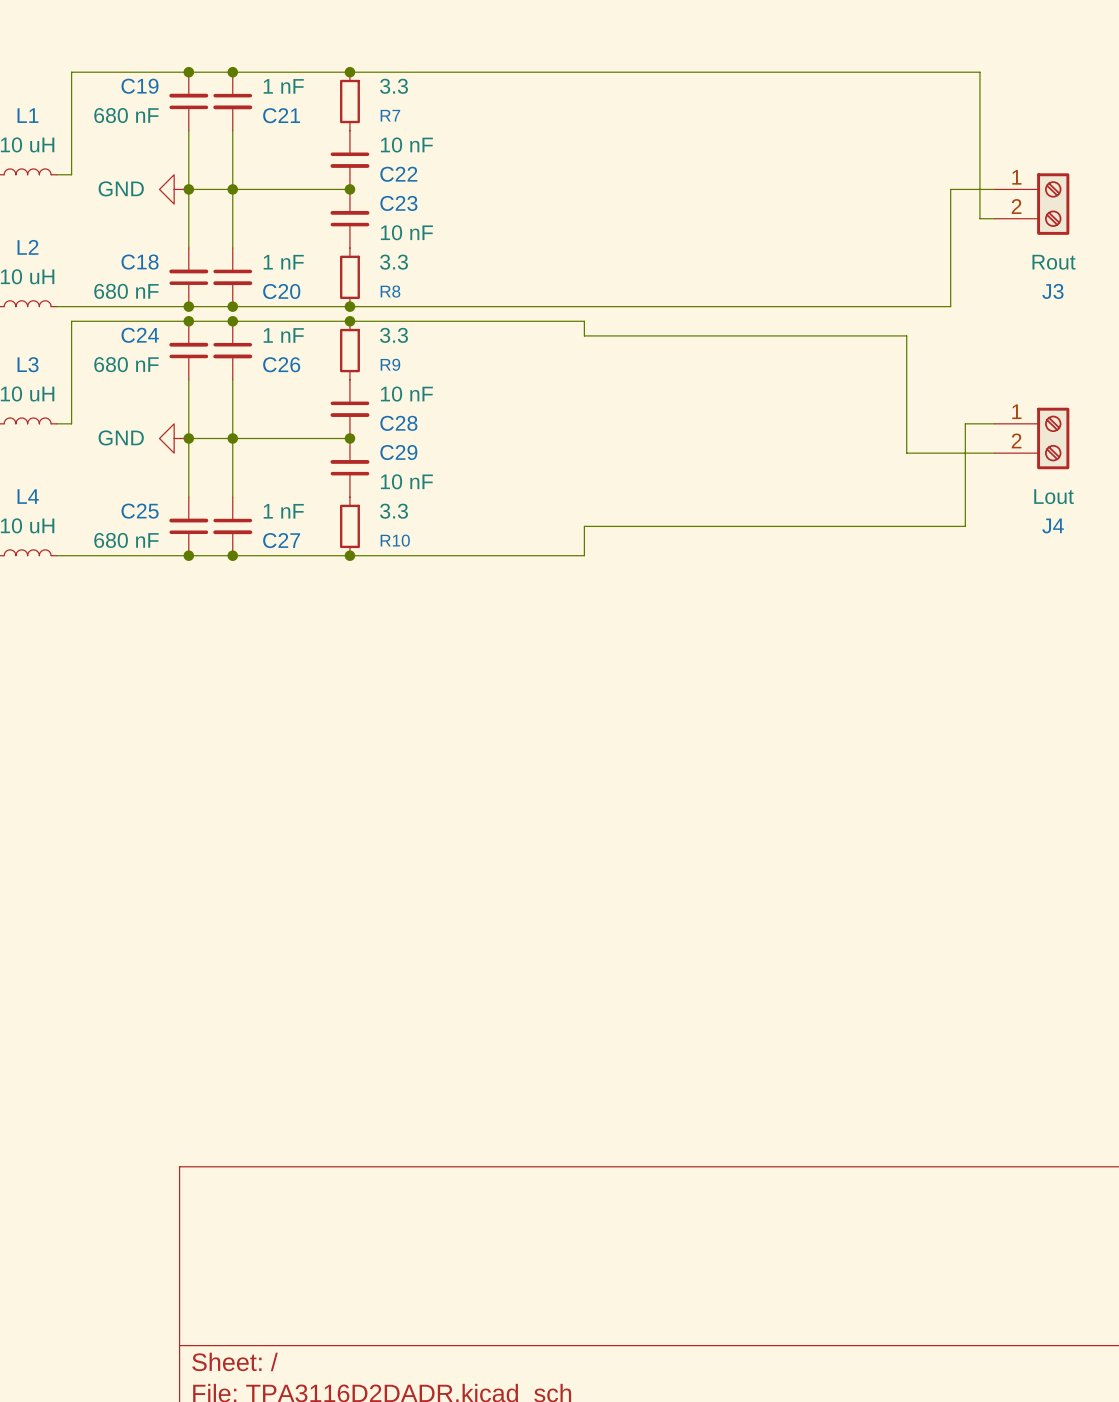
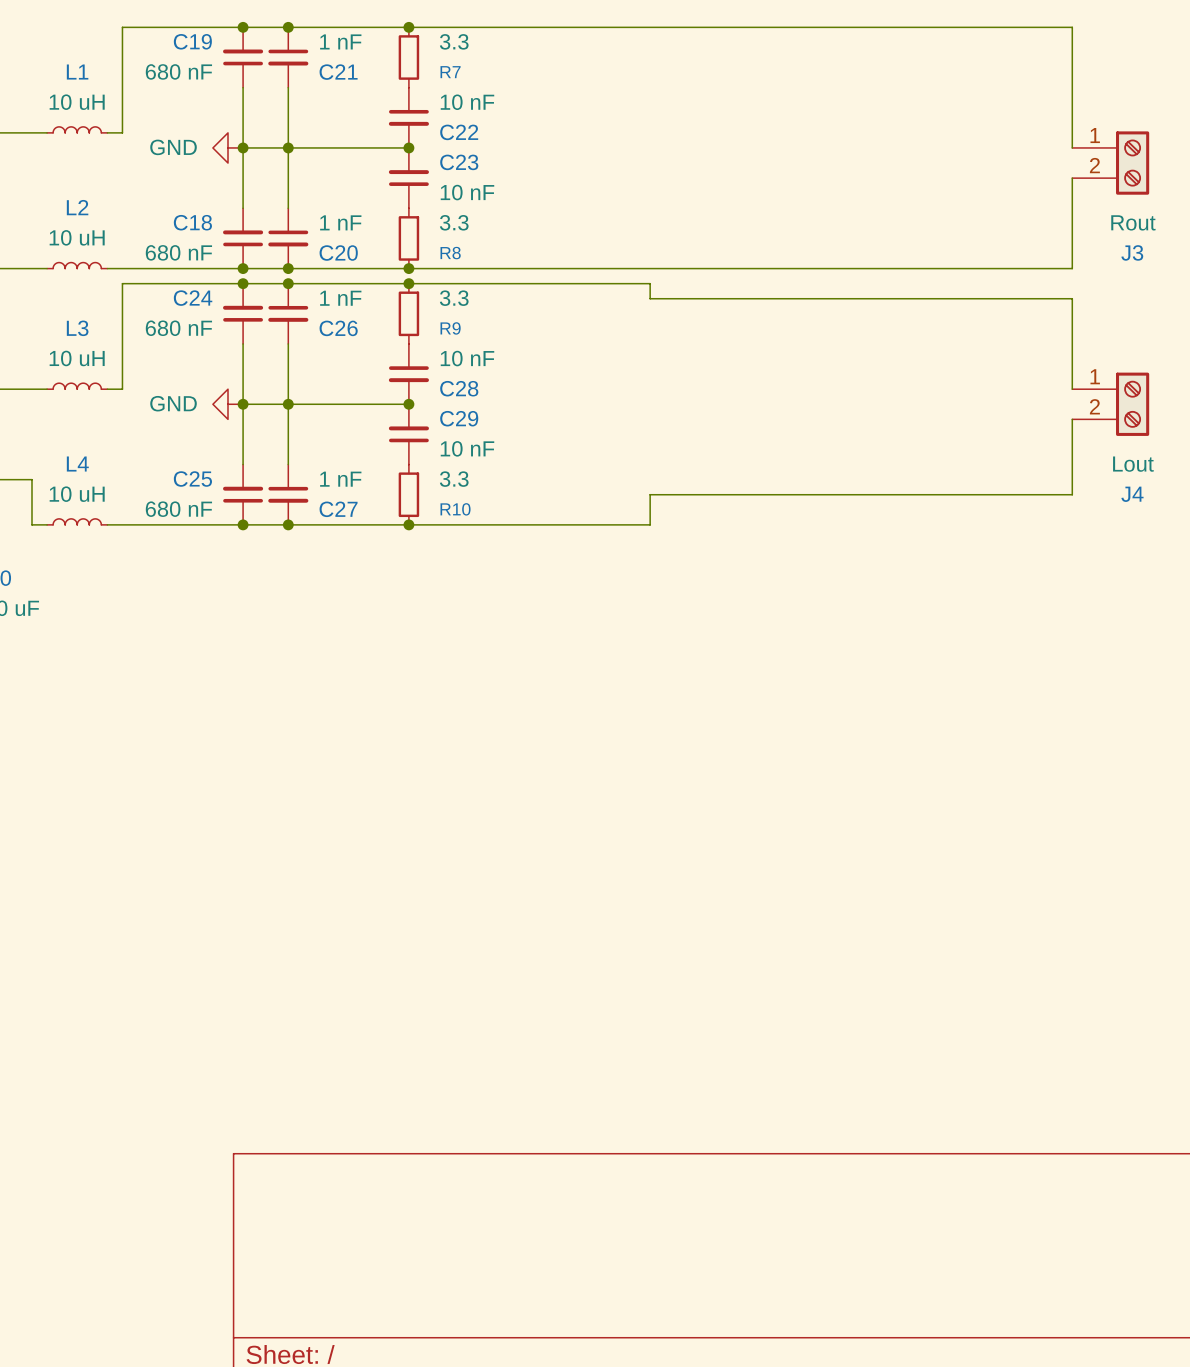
wire: (979, 72) (979, 218) (994, 218) -> (1057, 27) (1072, 27) (1072, 147)
wire: (994, 189) (950, 189) (950, 306) -> (1072, 178) (1072, 268) (1027, 268)
wire: (906, 335) (906, 453) (994, 453) -> (981, 298) (1072, 298) (1072, 389)
wire: (994, 423) (965, 423) (965, 526) -> (1072, 419) (1072, 494) (1042, 494)

